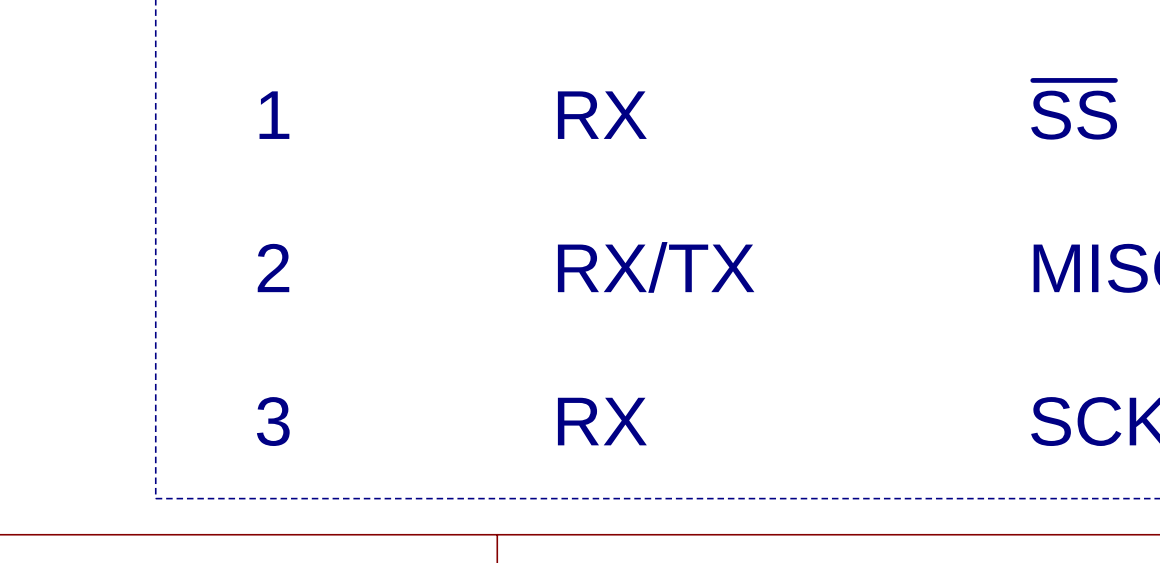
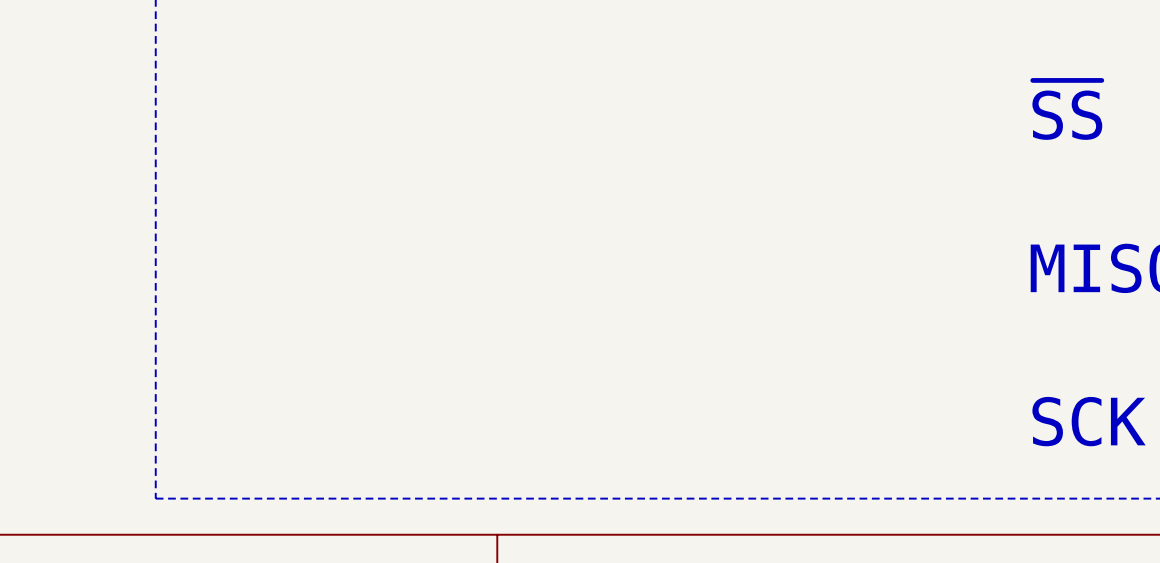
text: 1 (274, 115) -> none
text: RX (602, 115) -> none
text: RX/TX (656, 267) -> none
text: 2 (273, 268) -> none
text: 3 (273, 421) -> none
text: RX (602, 421) -> none

